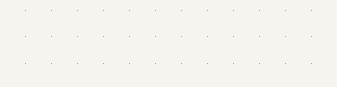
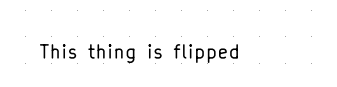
label: none -> This thing is flipped (138, 53)

